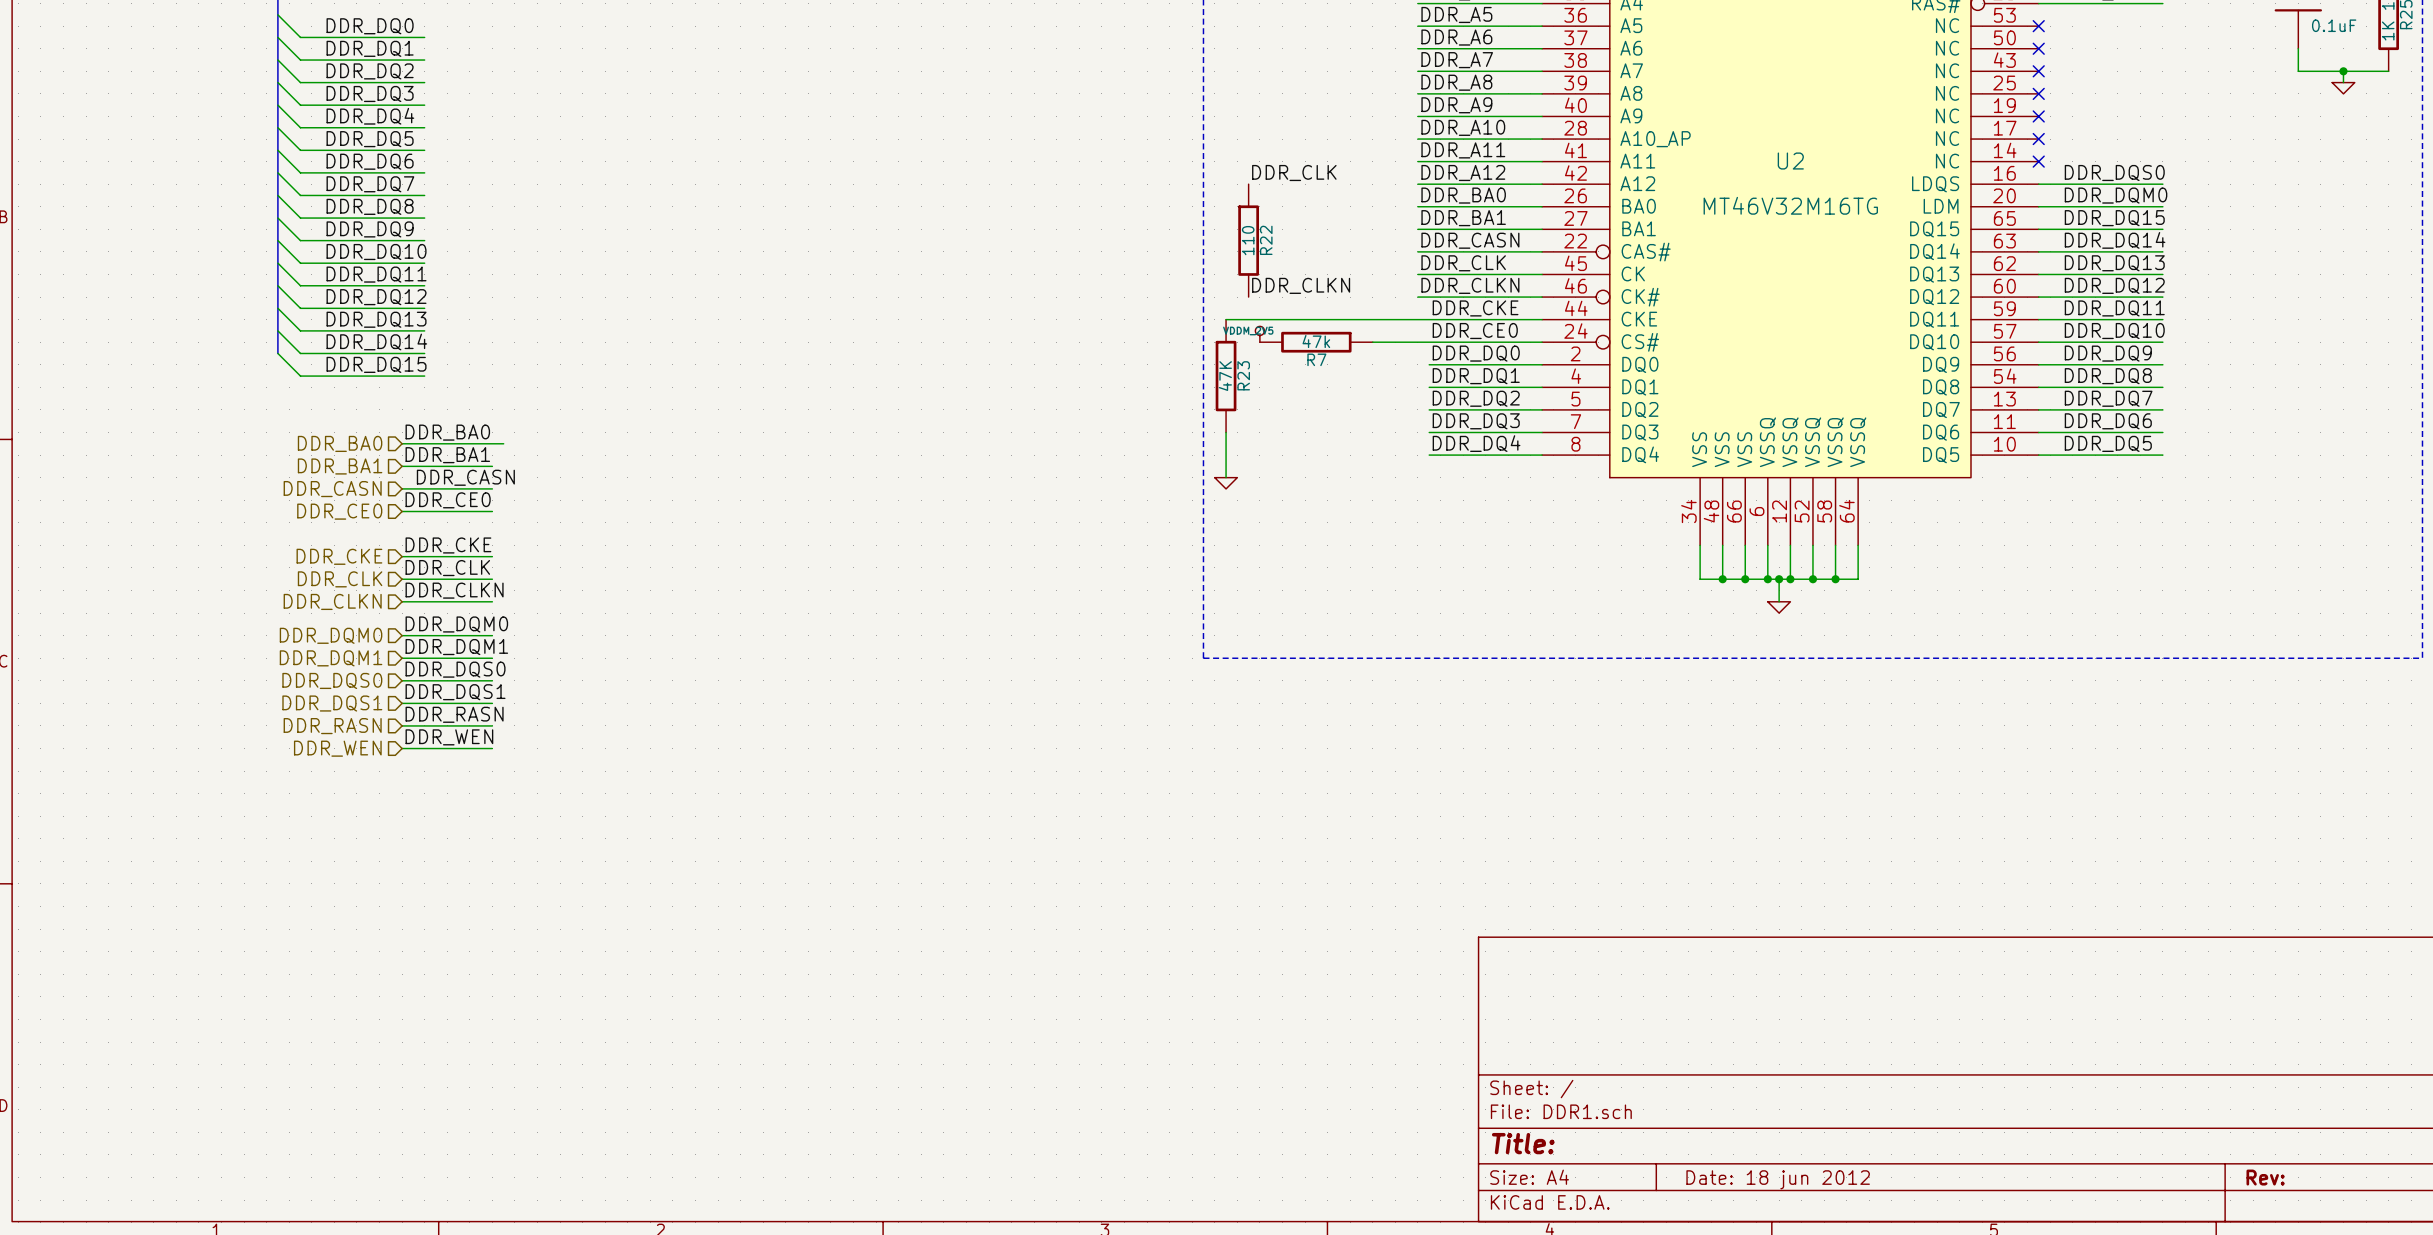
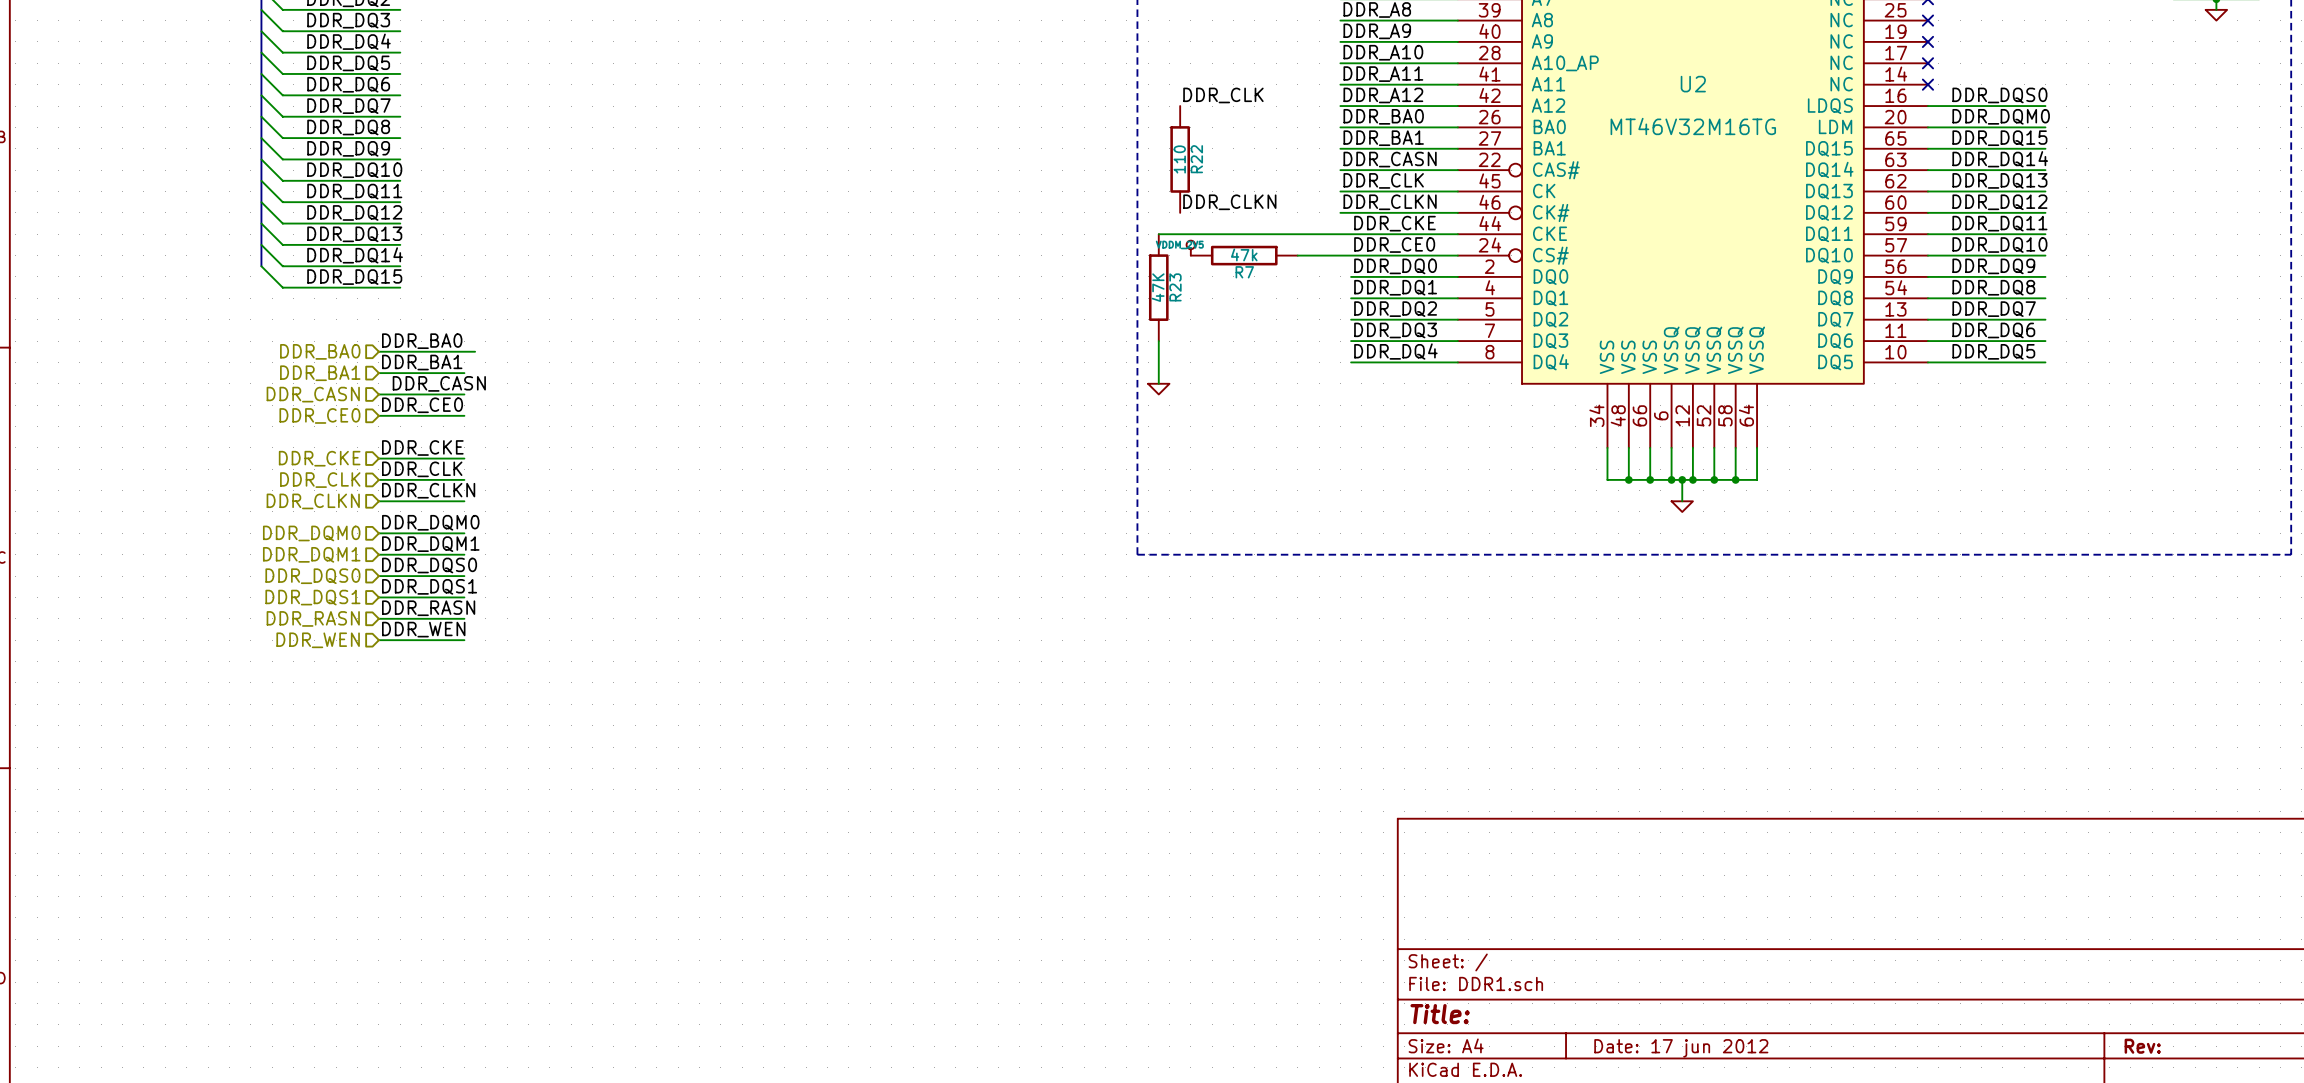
title block: Date: 18 jun 2012 (1778, 1179) -> Date: 17 jun 2012 (1681, 1048)

